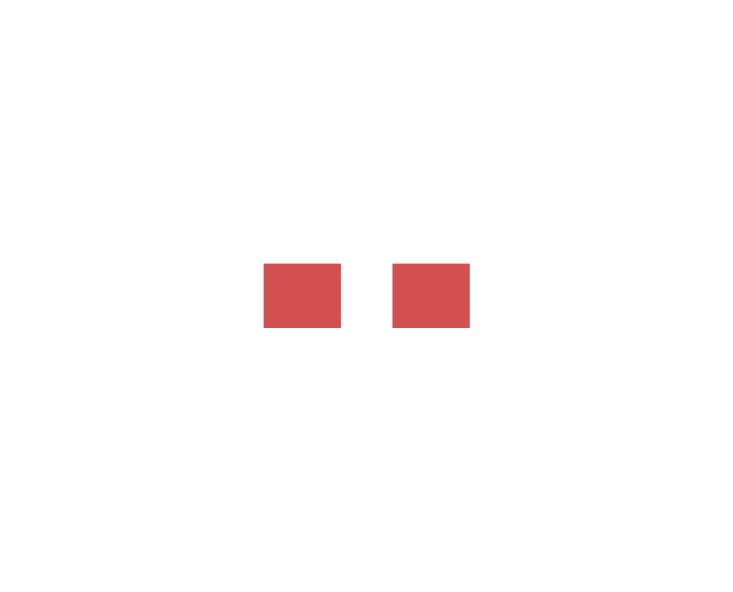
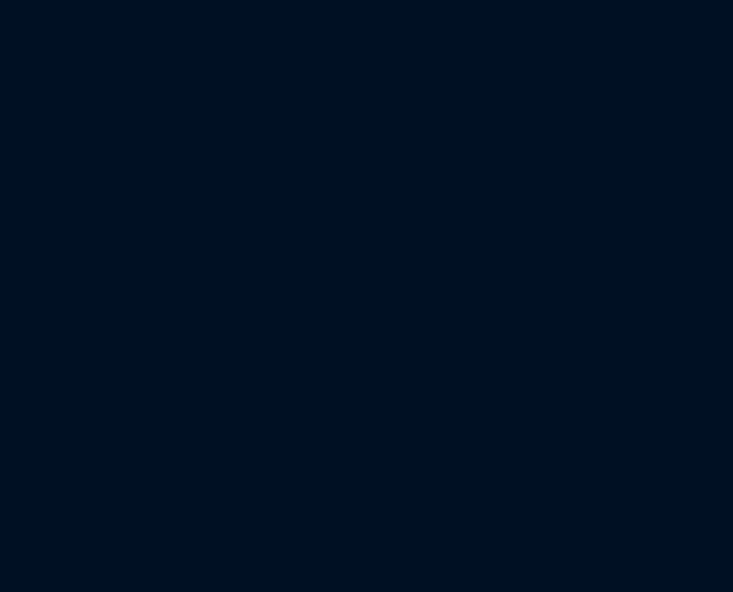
part: (366, 295) -> none

